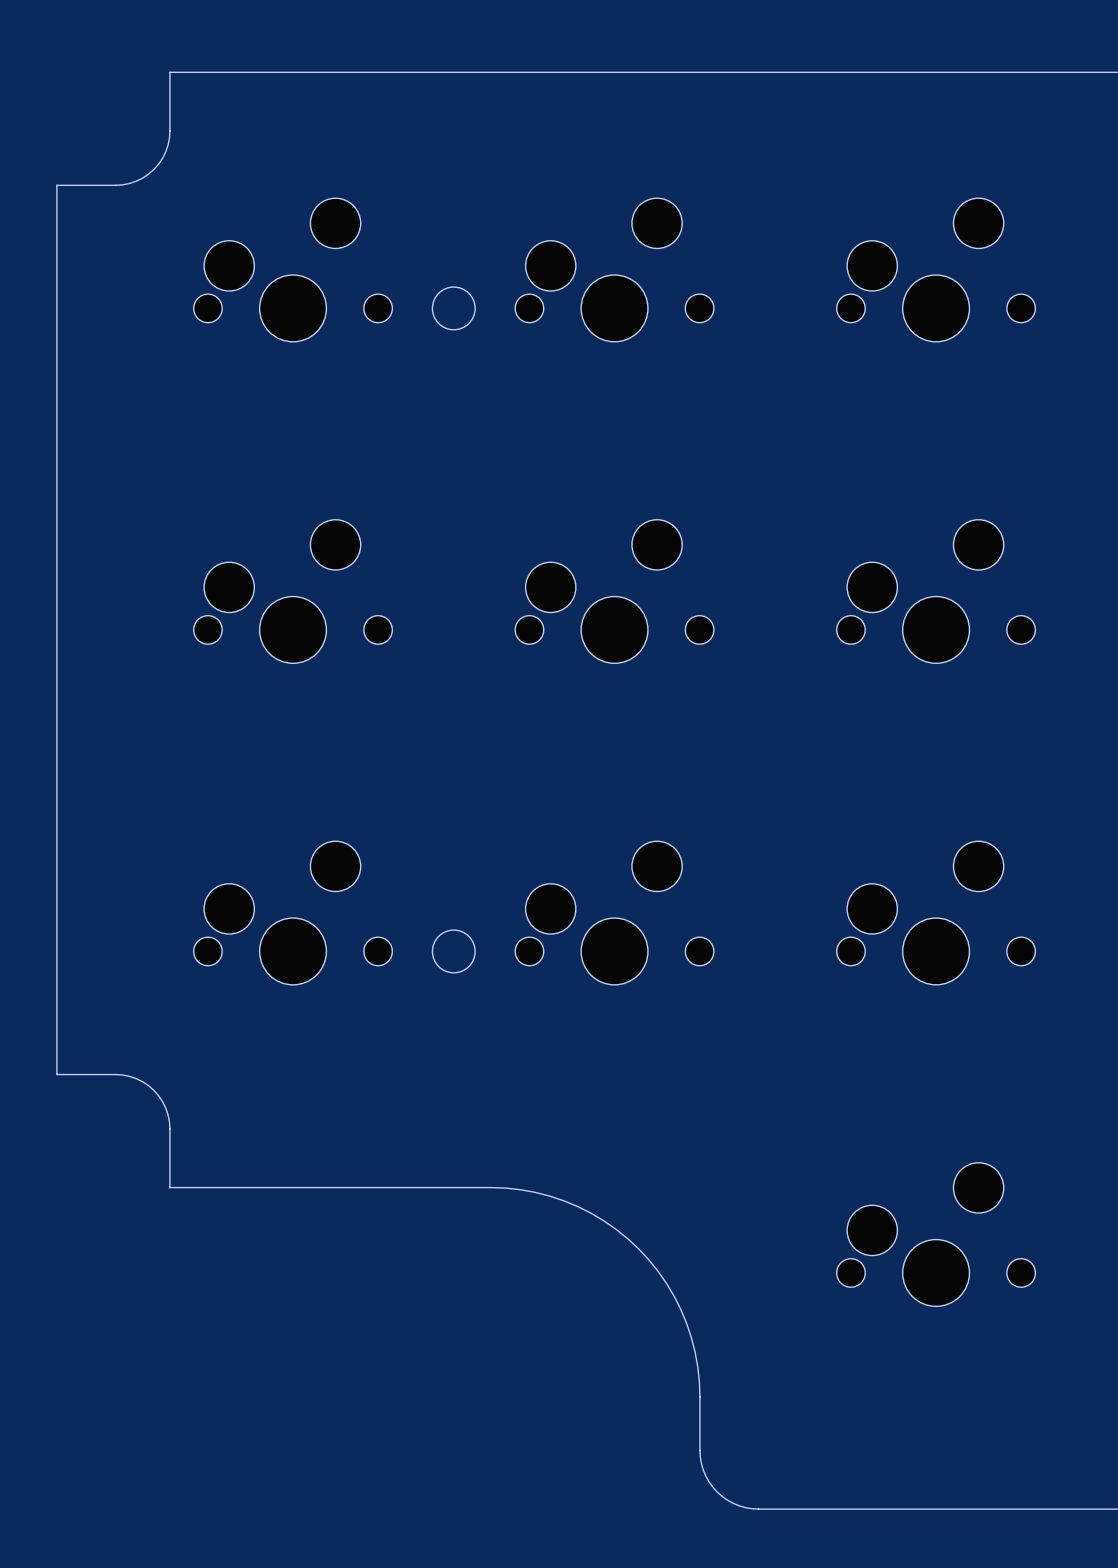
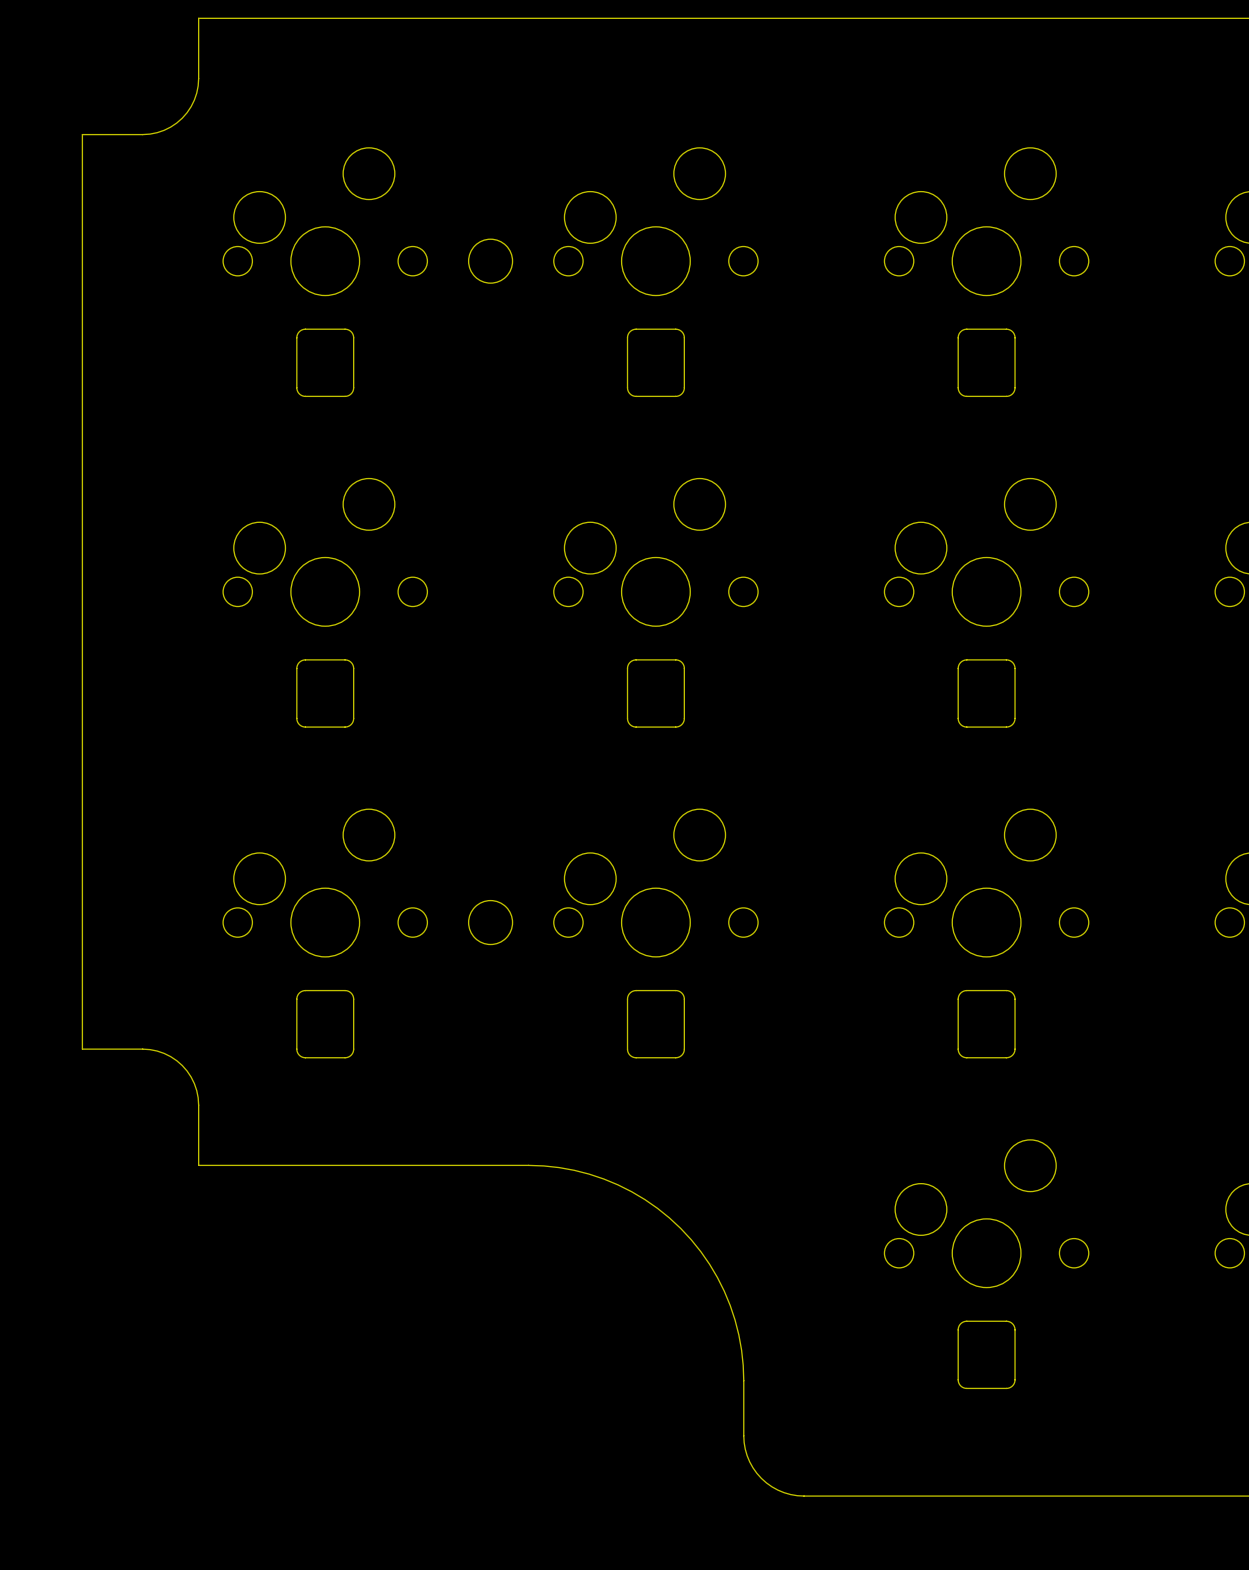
part: none -> (325, 362)
part: none -> (655, 362)
part: none -> (986, 362)
part: none -> (325, 693)
part: none -> (655, 693)
part: none -> (986, 693)
part: none -> (325, 1024)
part: none -> (655, 1024)
part: none -> (986, 1024)
part: none -> (986, 1354)

